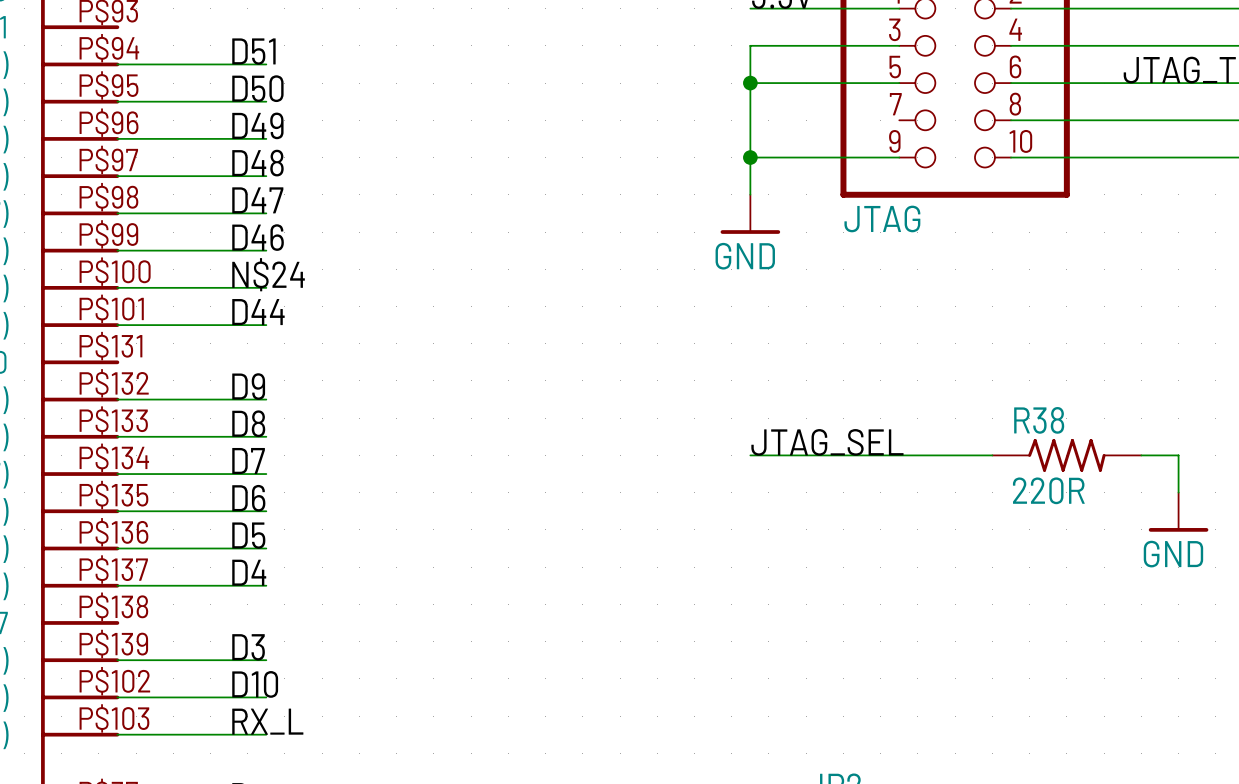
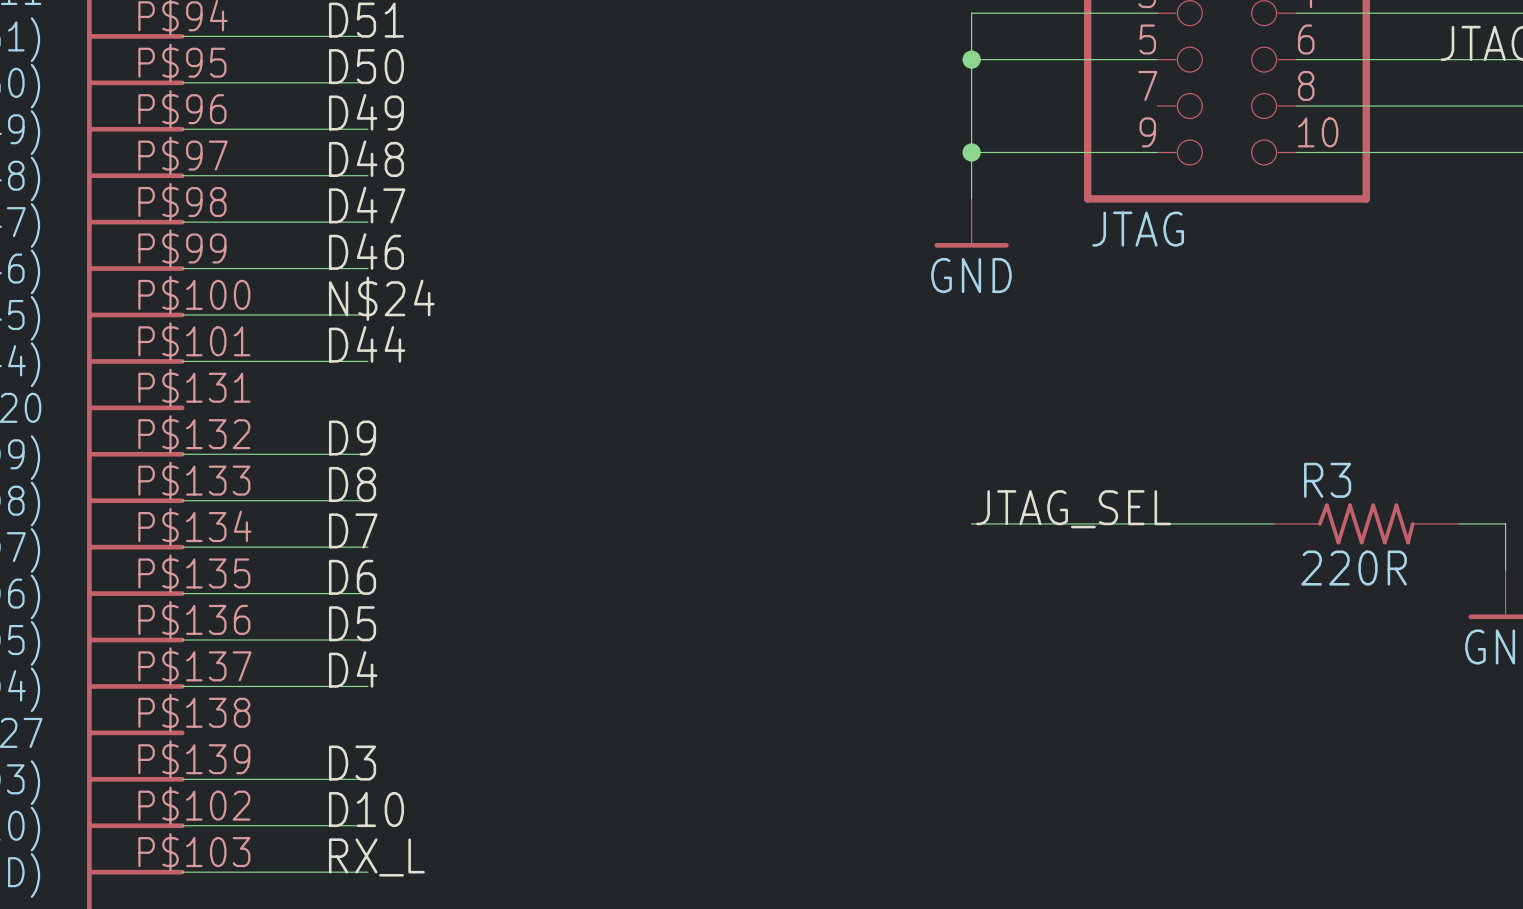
R38 name: R38 (1039, 420) -> R3 (1327, 480)

